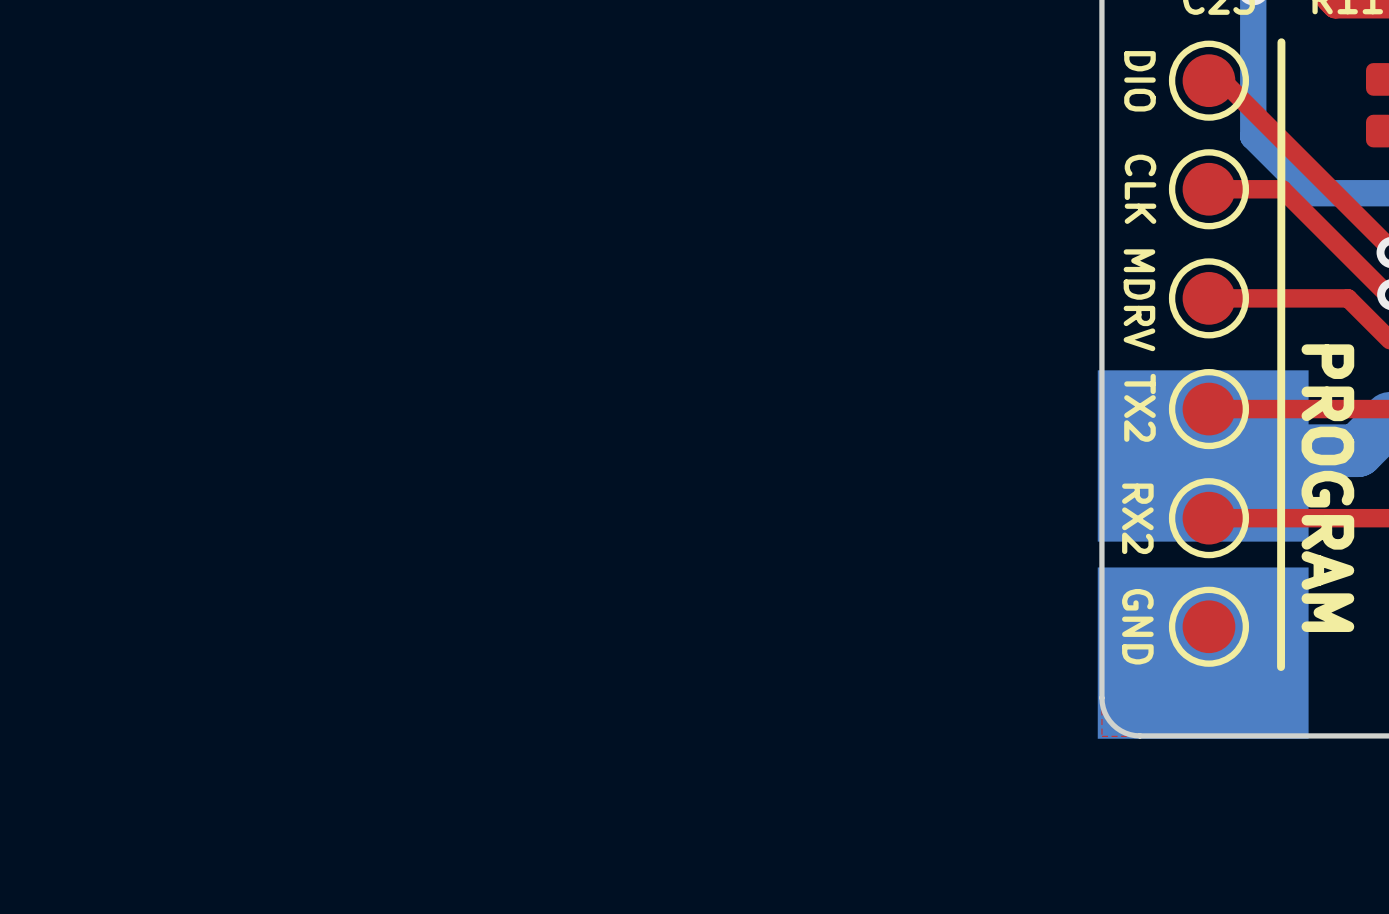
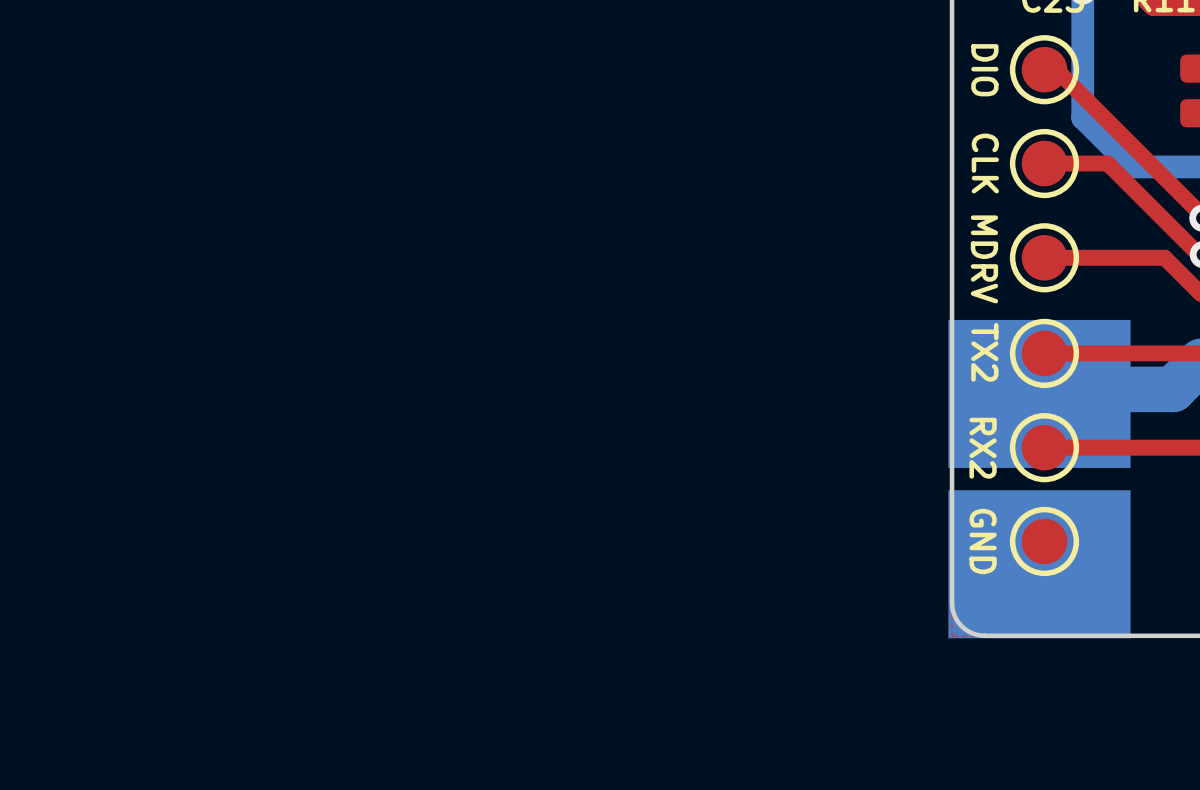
line: (1281, 42) (1281, 667) -> none
text: PROGRAM (1327, 488) -> none

